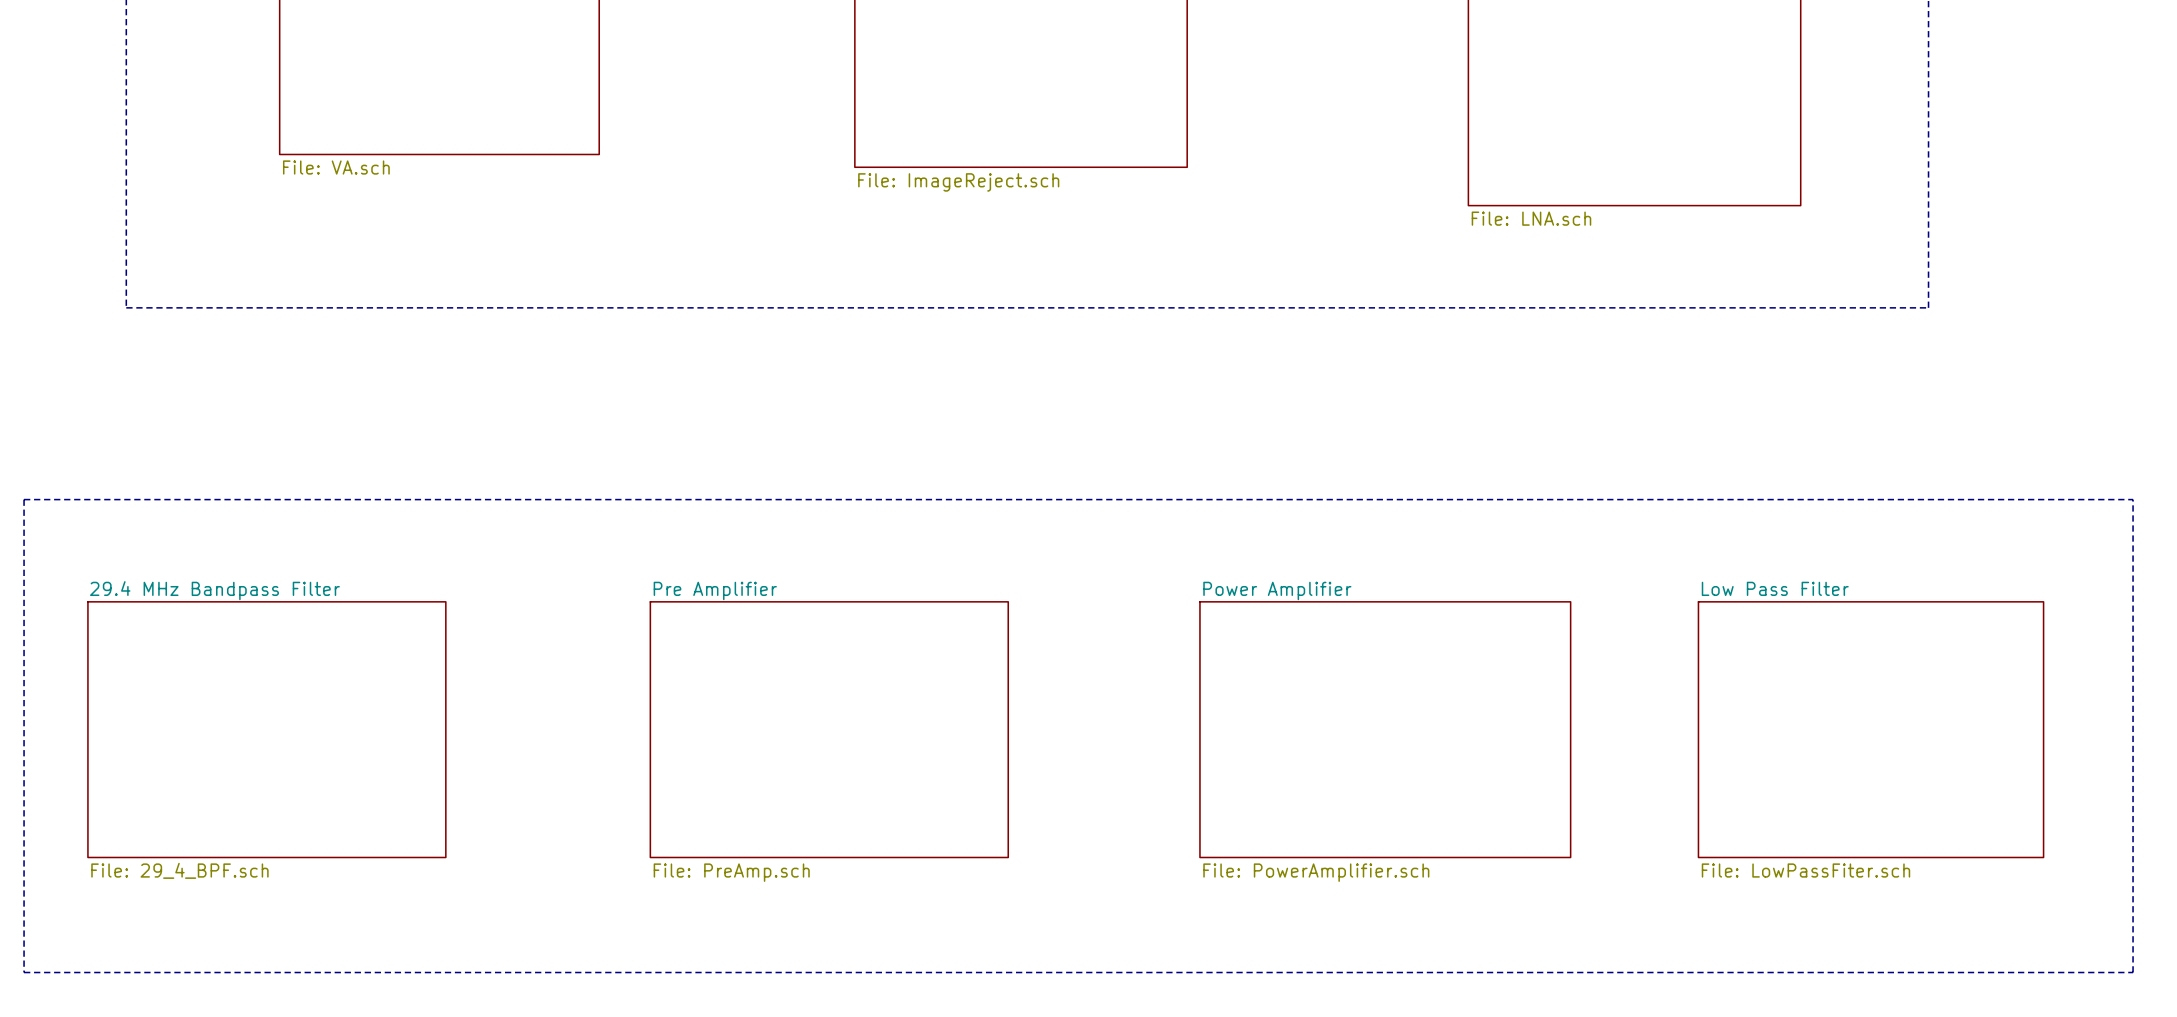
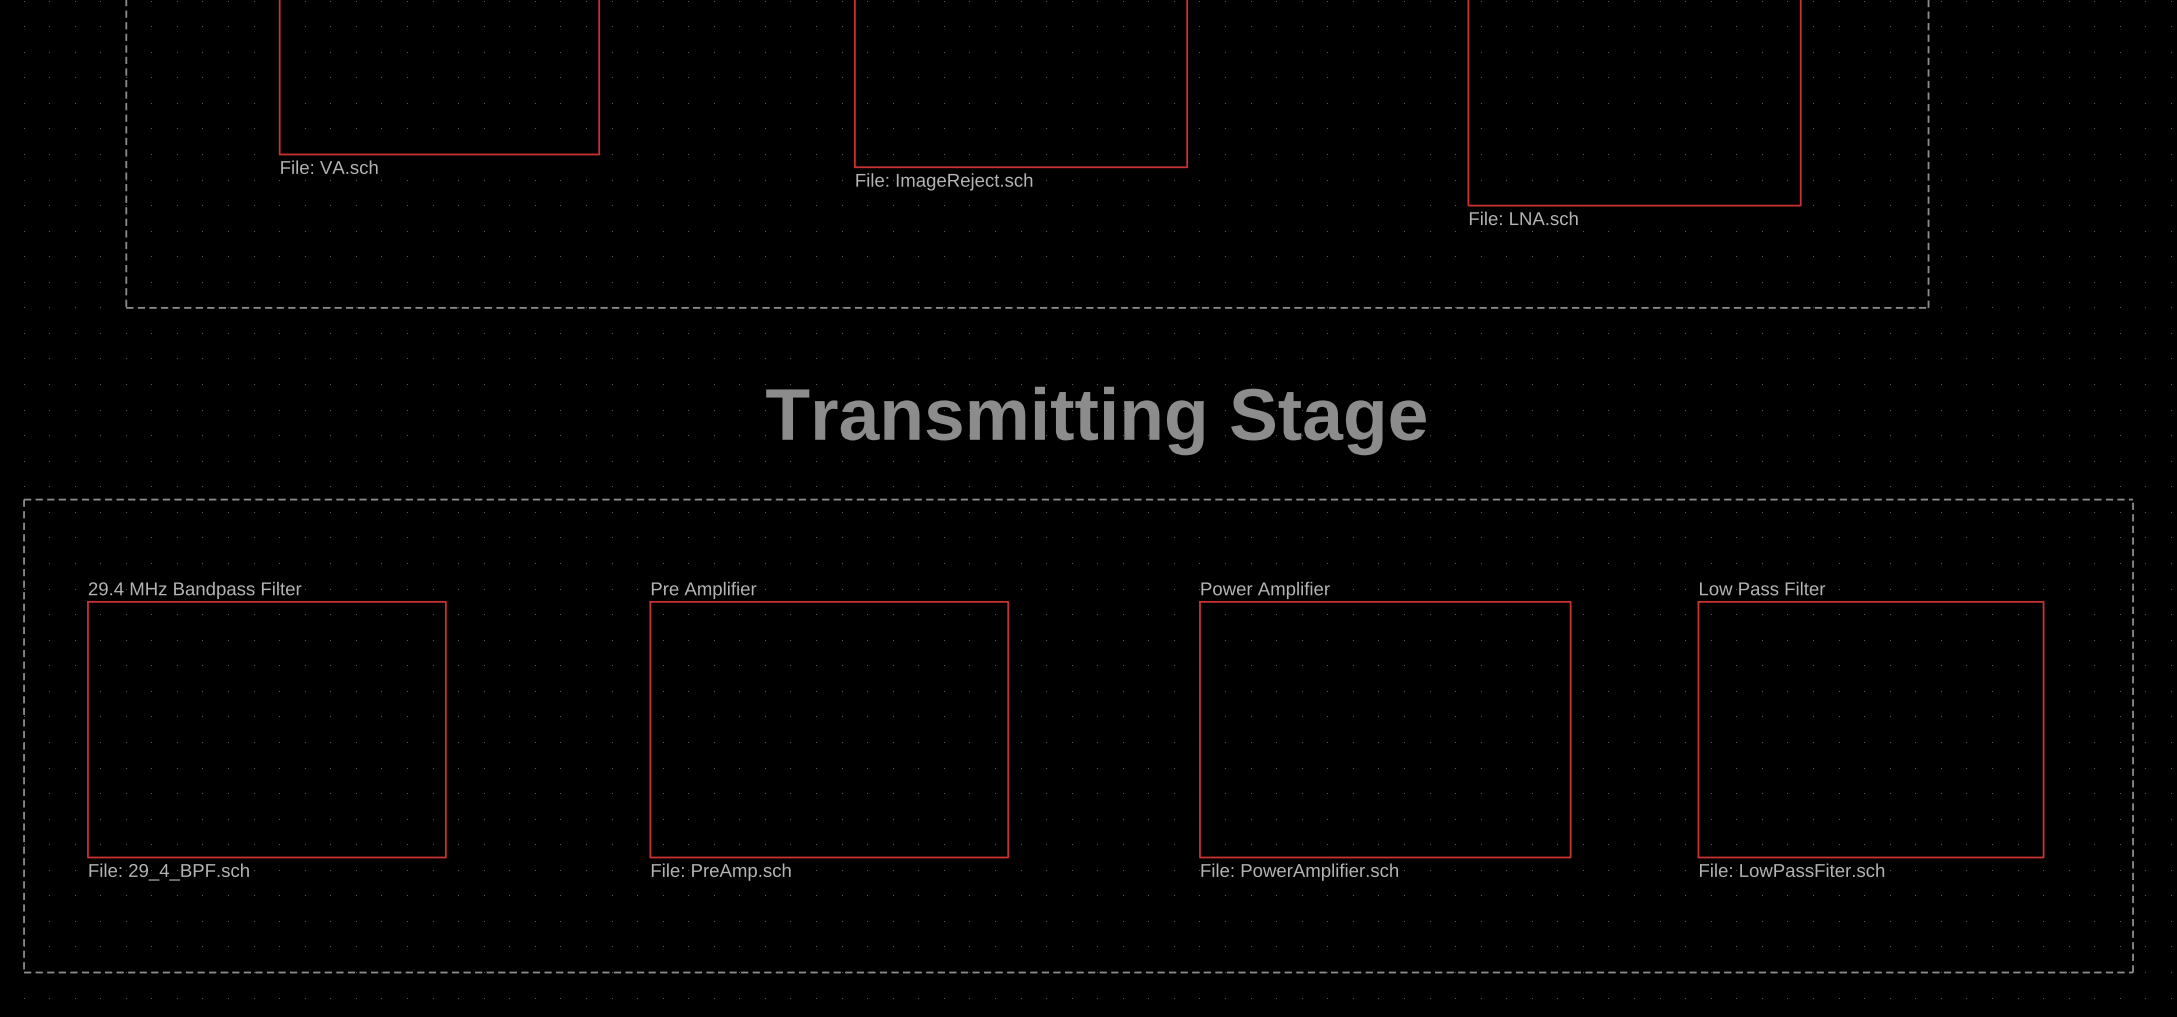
text: none -> Transmitting Stage (1096, 421)

